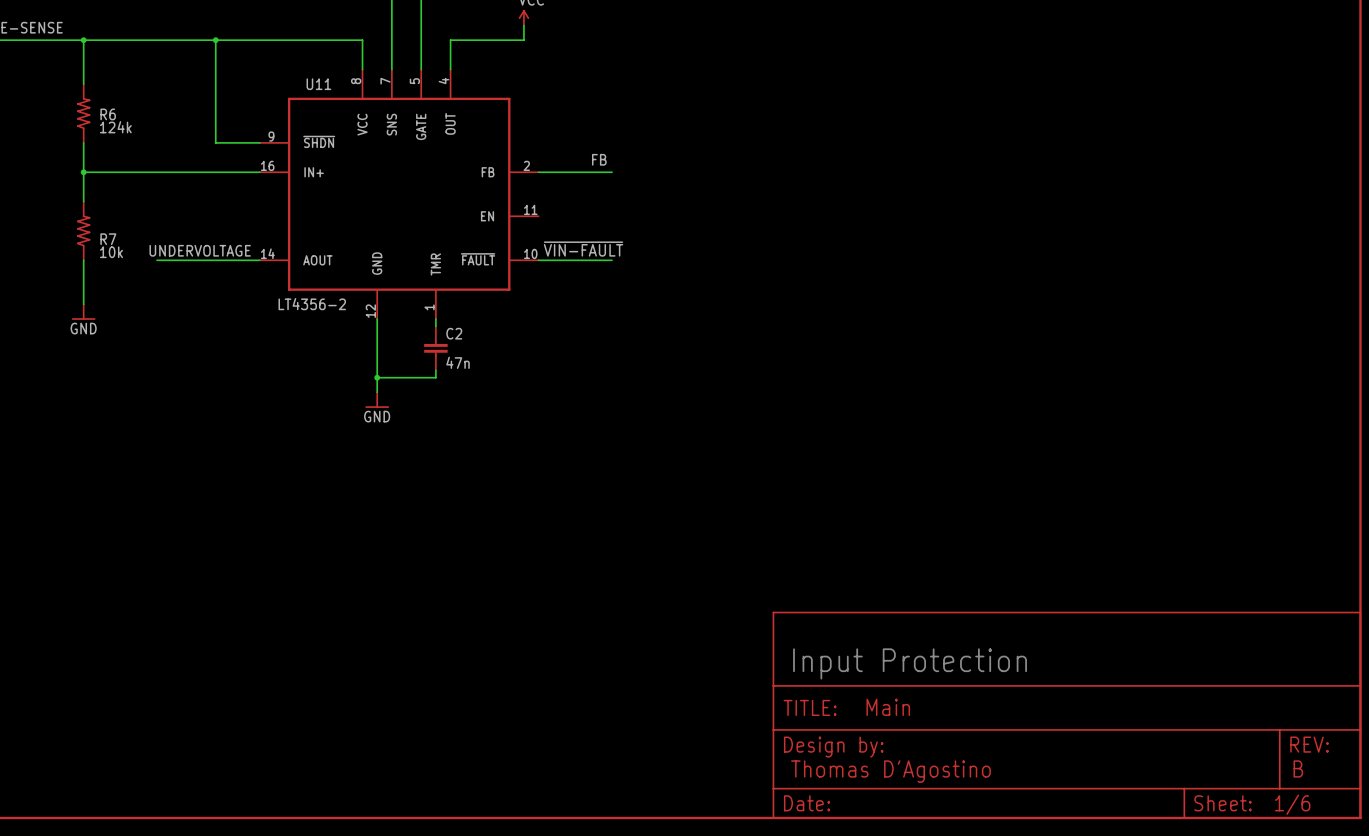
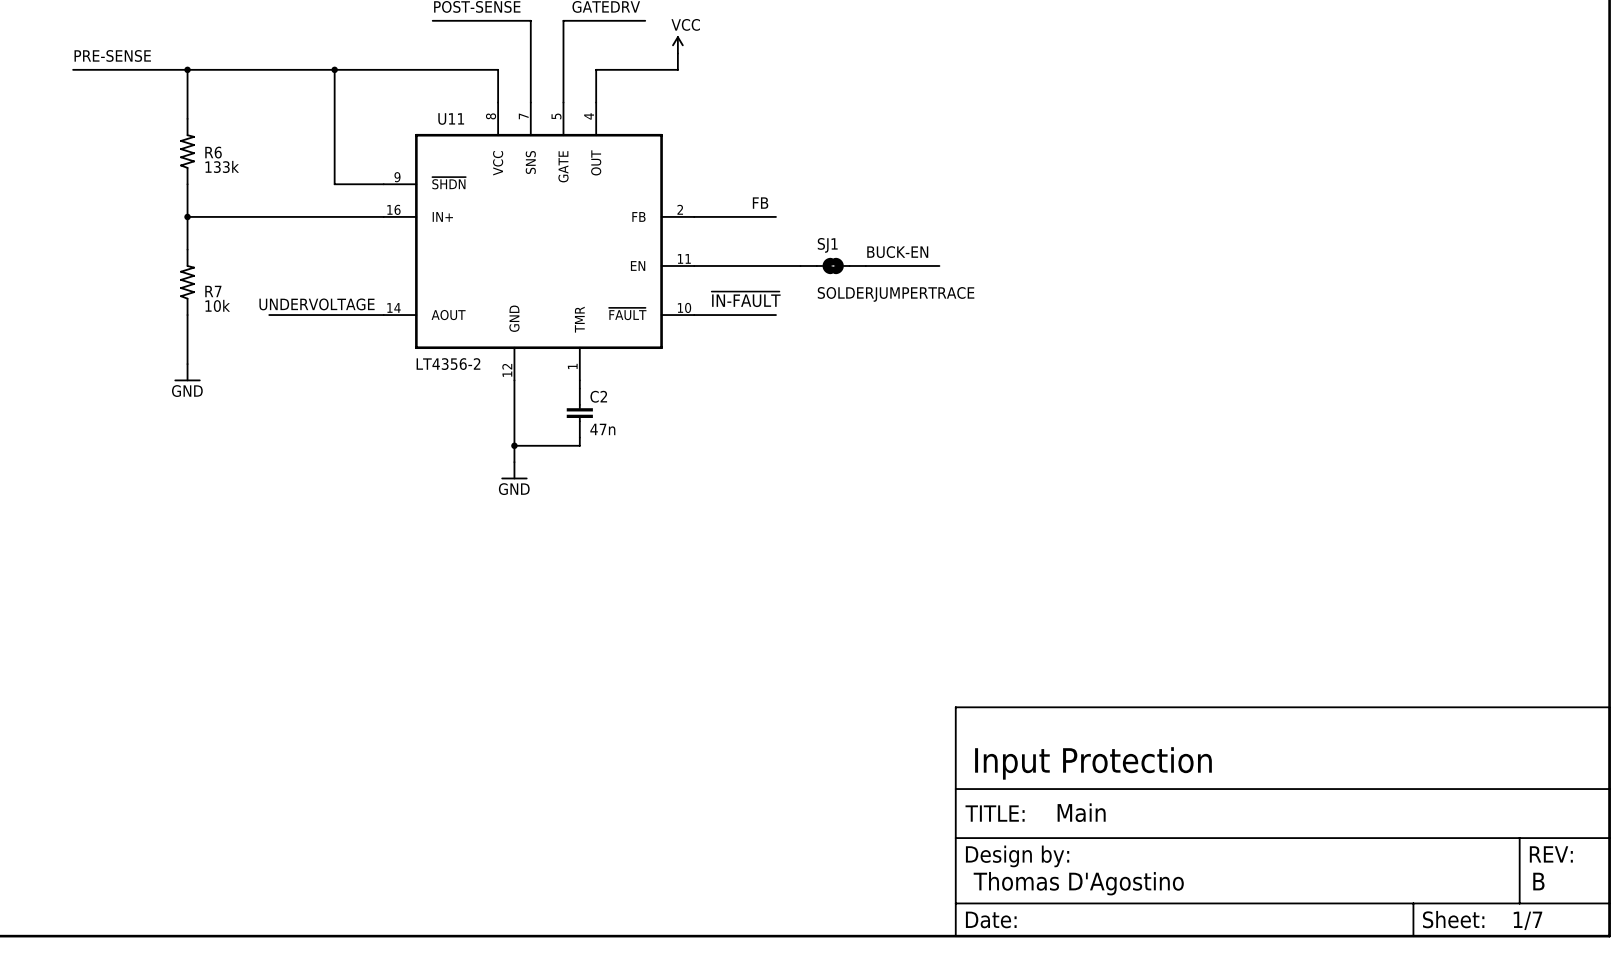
R6 value: 124k (115, 127) -> 133k (222, 166)
label: none -> BUCK-EN (897, 252)
wire: none -> (694, 265) (800, 265)
SJ1: none -> SOLDERJUMPERTRACE (833, 265)
wire: none -> (865, 265) (939, 265)
label: ~{VIN-FAULT} (583, 249) -> ~{IN-FAULT} (746, 299)
part text: 1/6 (1292, 804) -> 1/7 (1527, 920)

